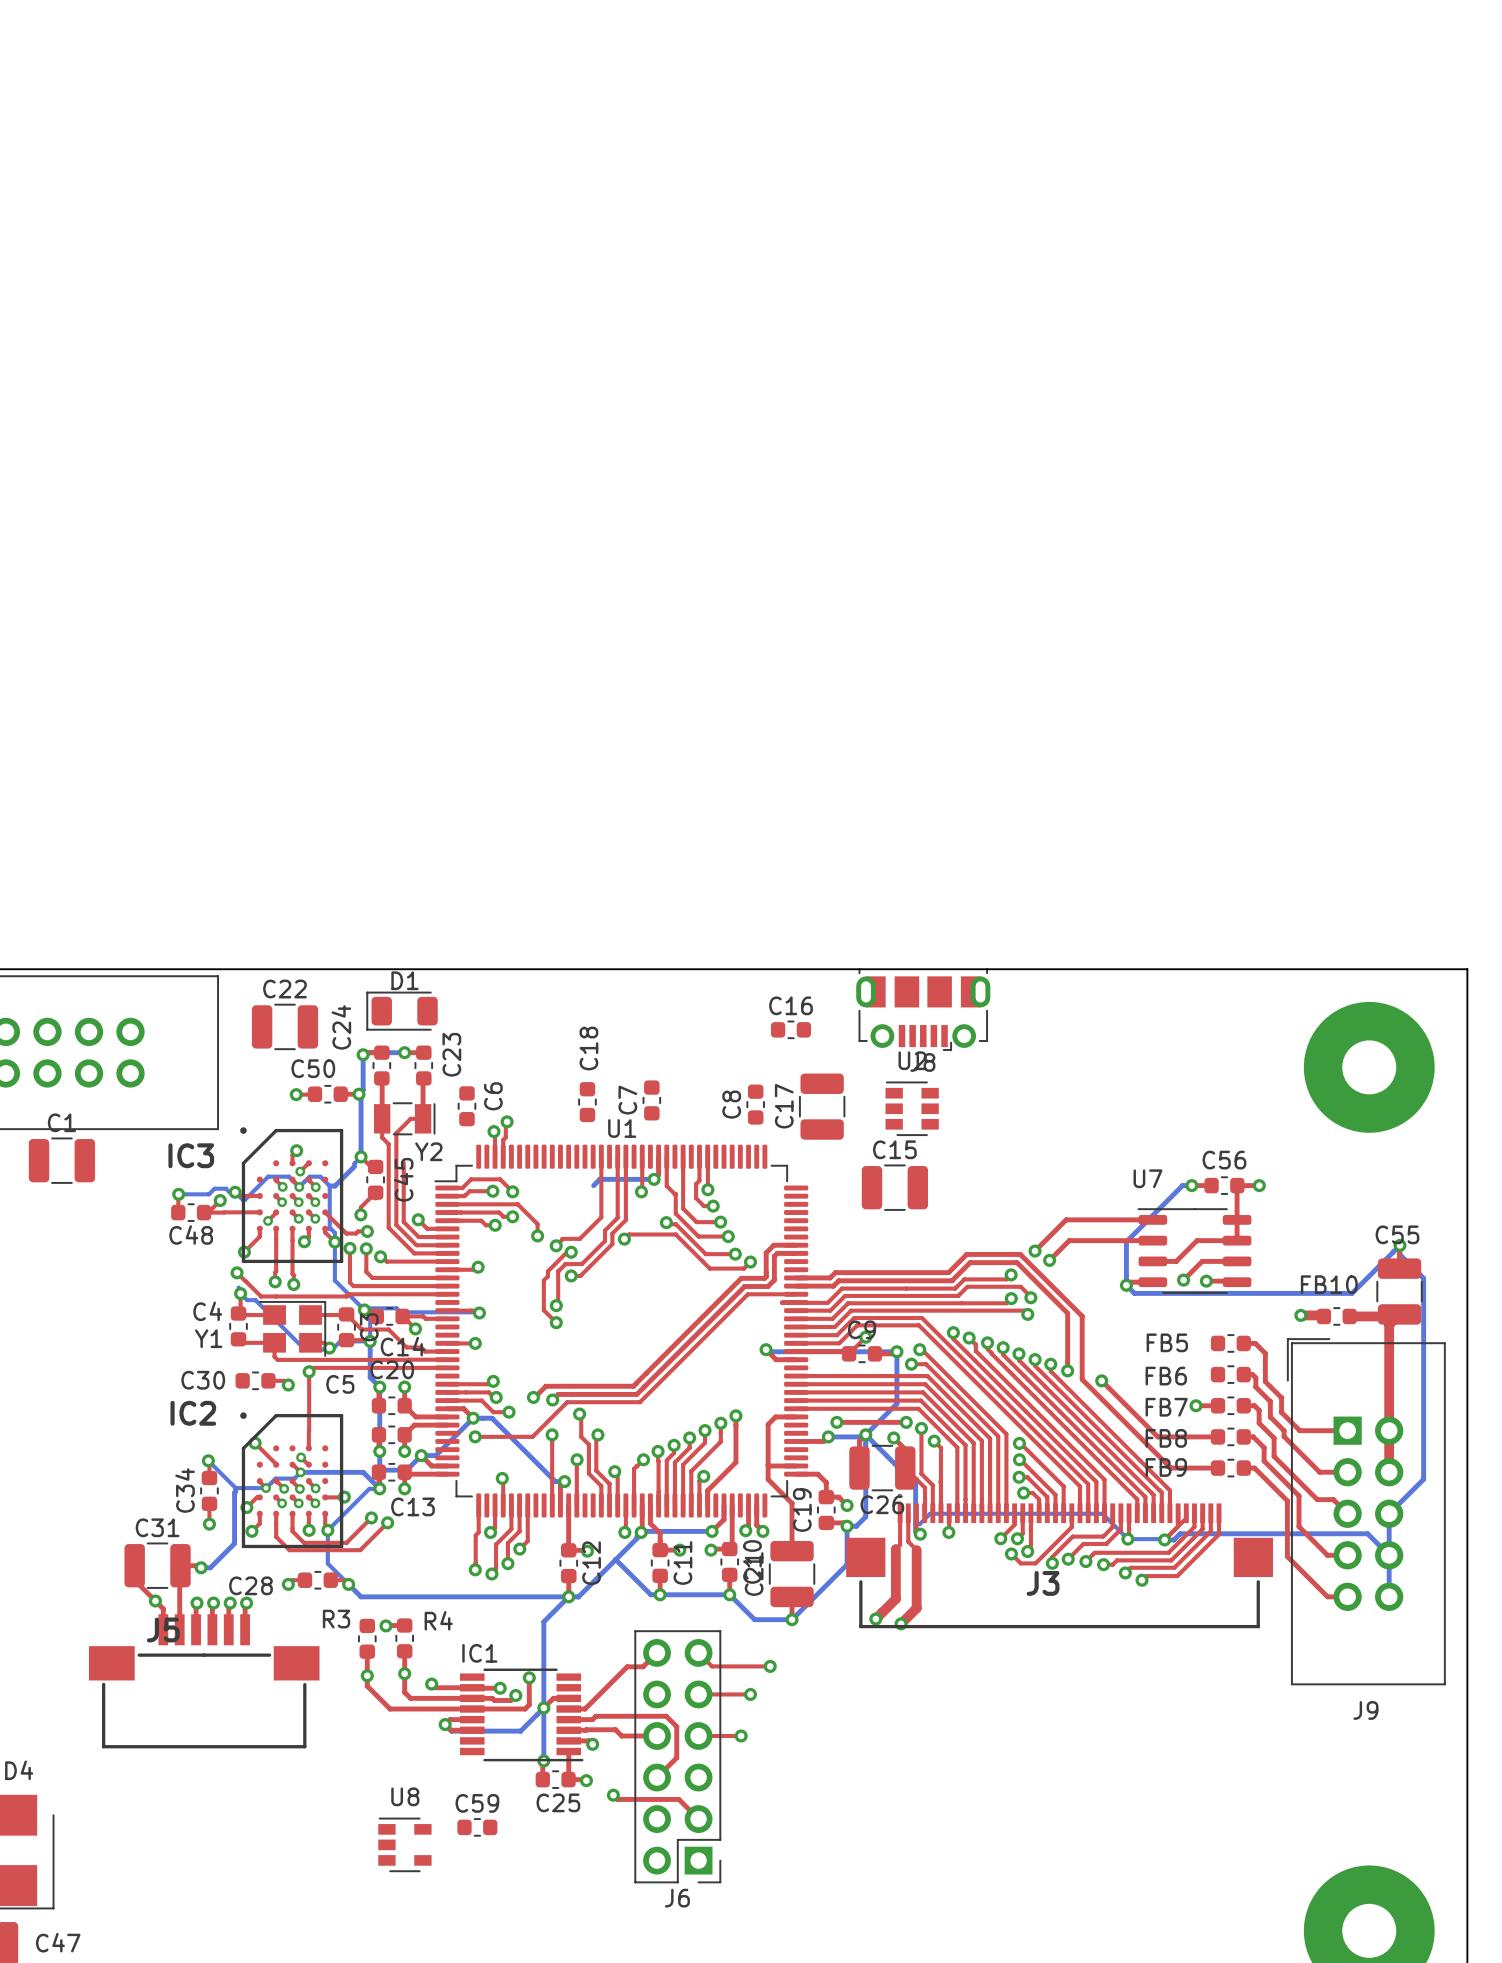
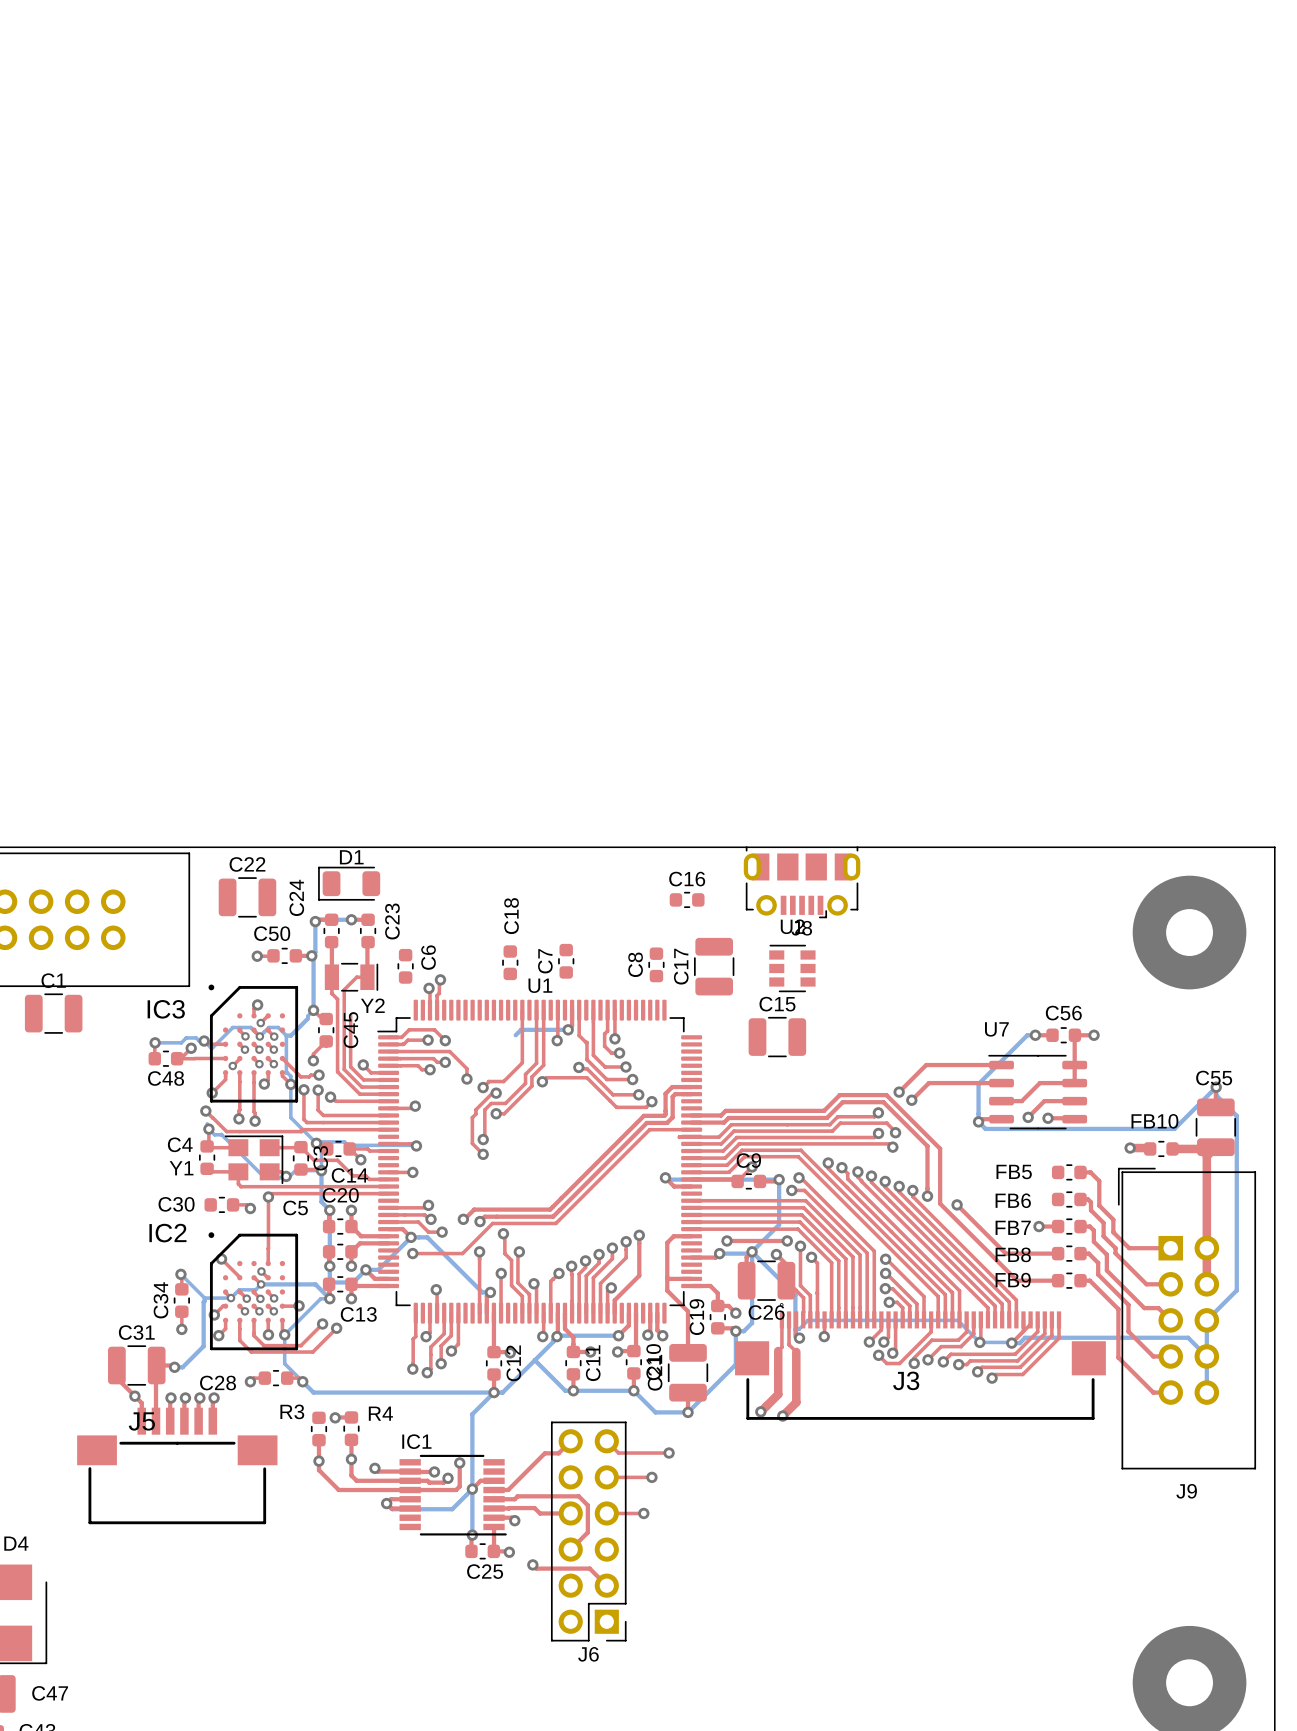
C59: (477, 1827) -> none
U8: (404, 1844) -> none

